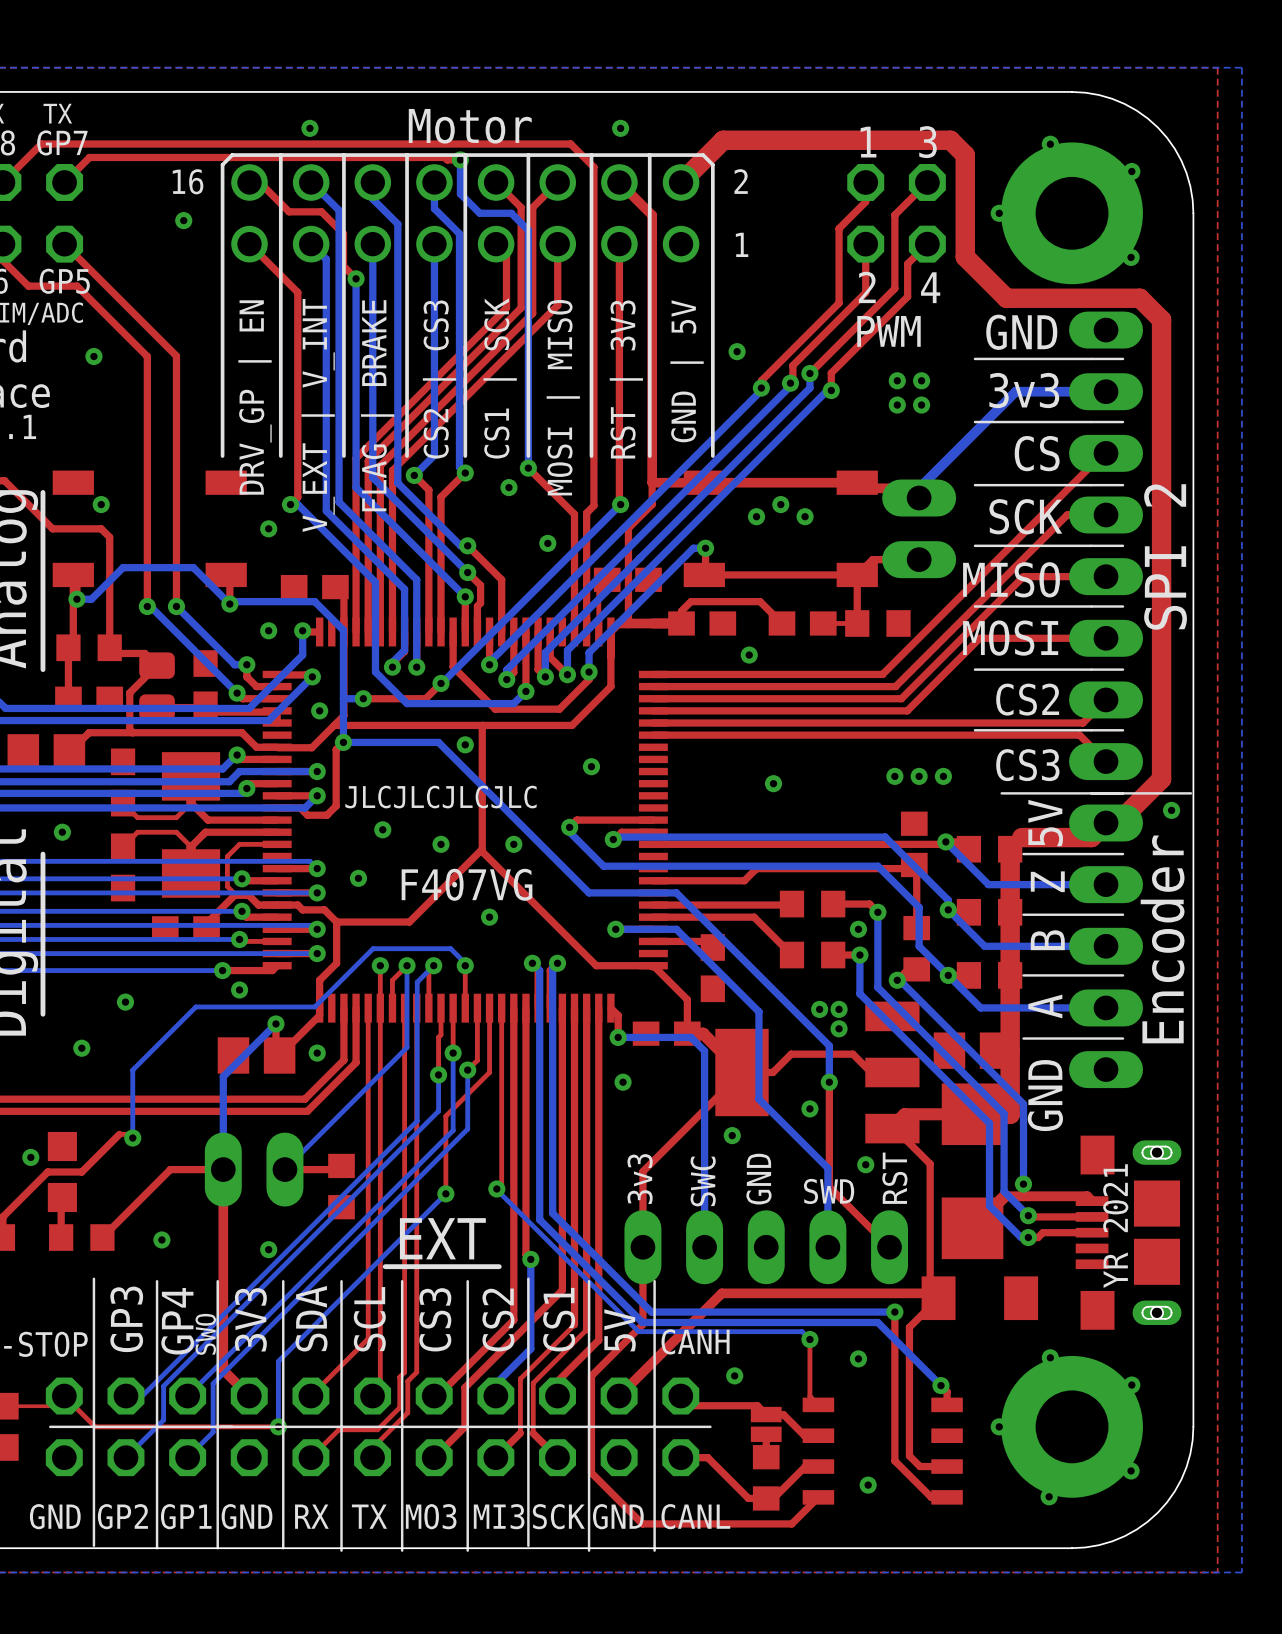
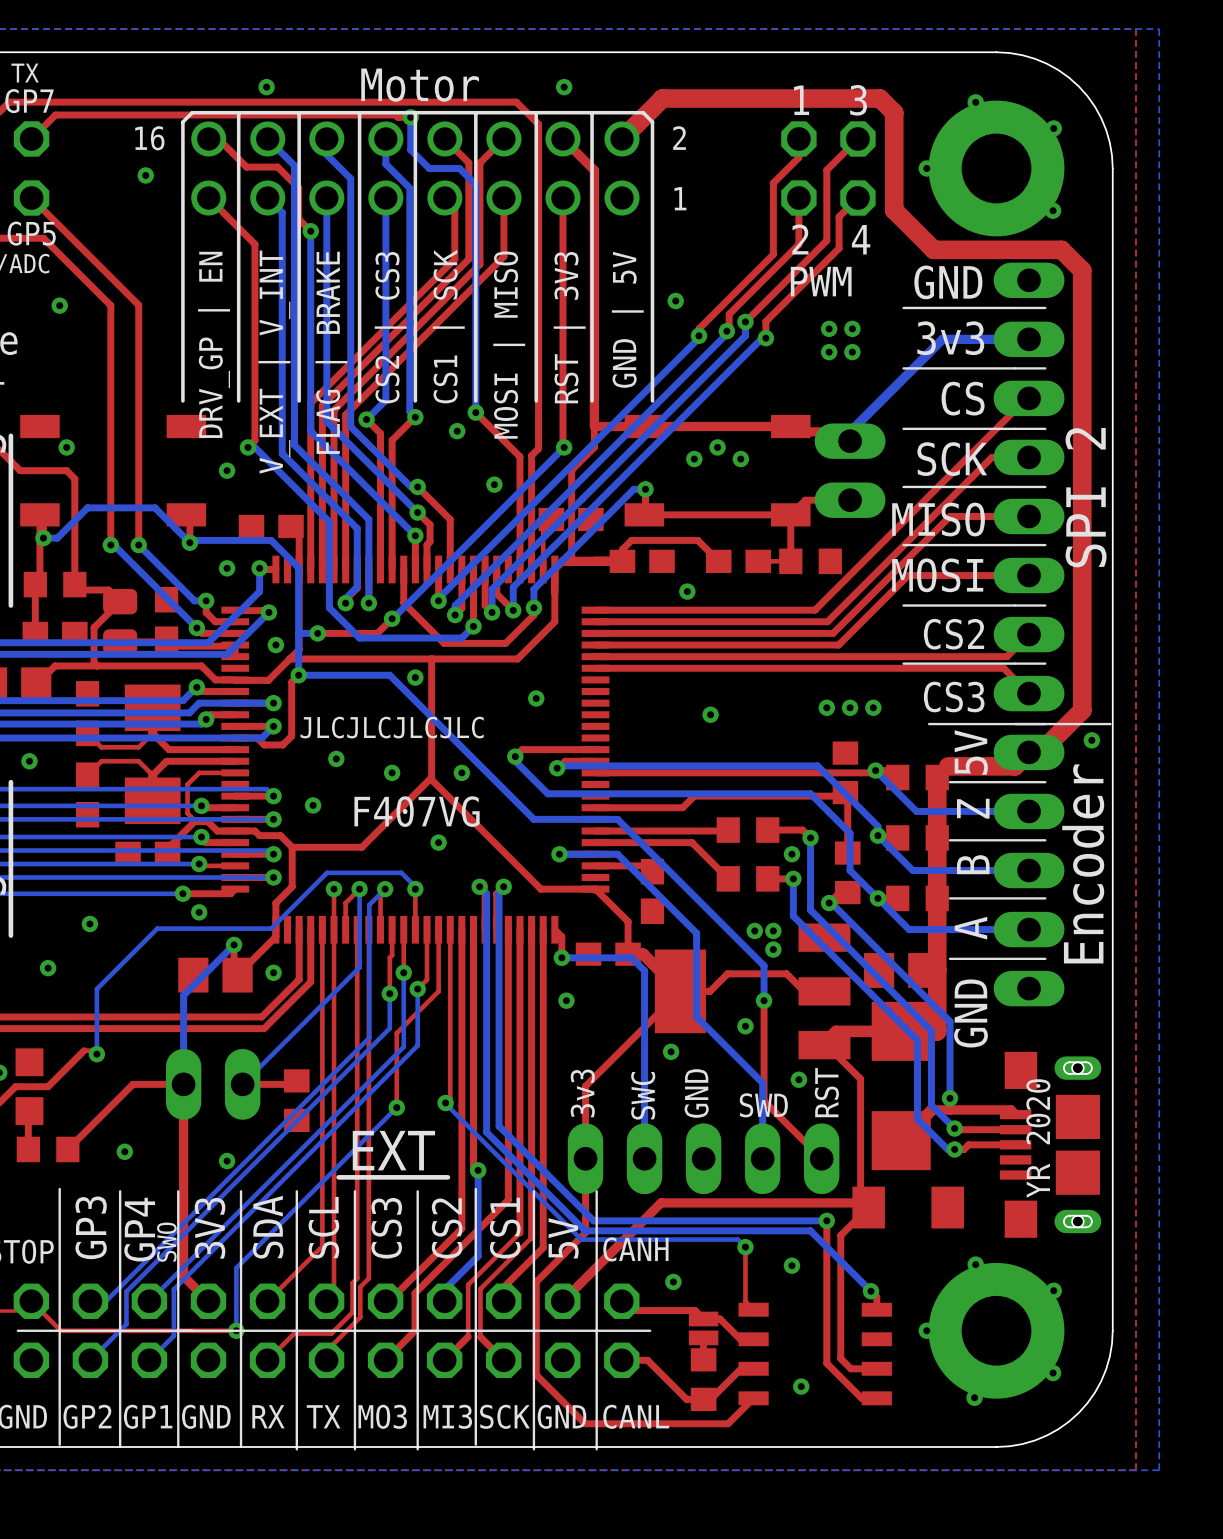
text: YR 2021 (1115, 1226) -> YR 2020 (1038, 1138)

